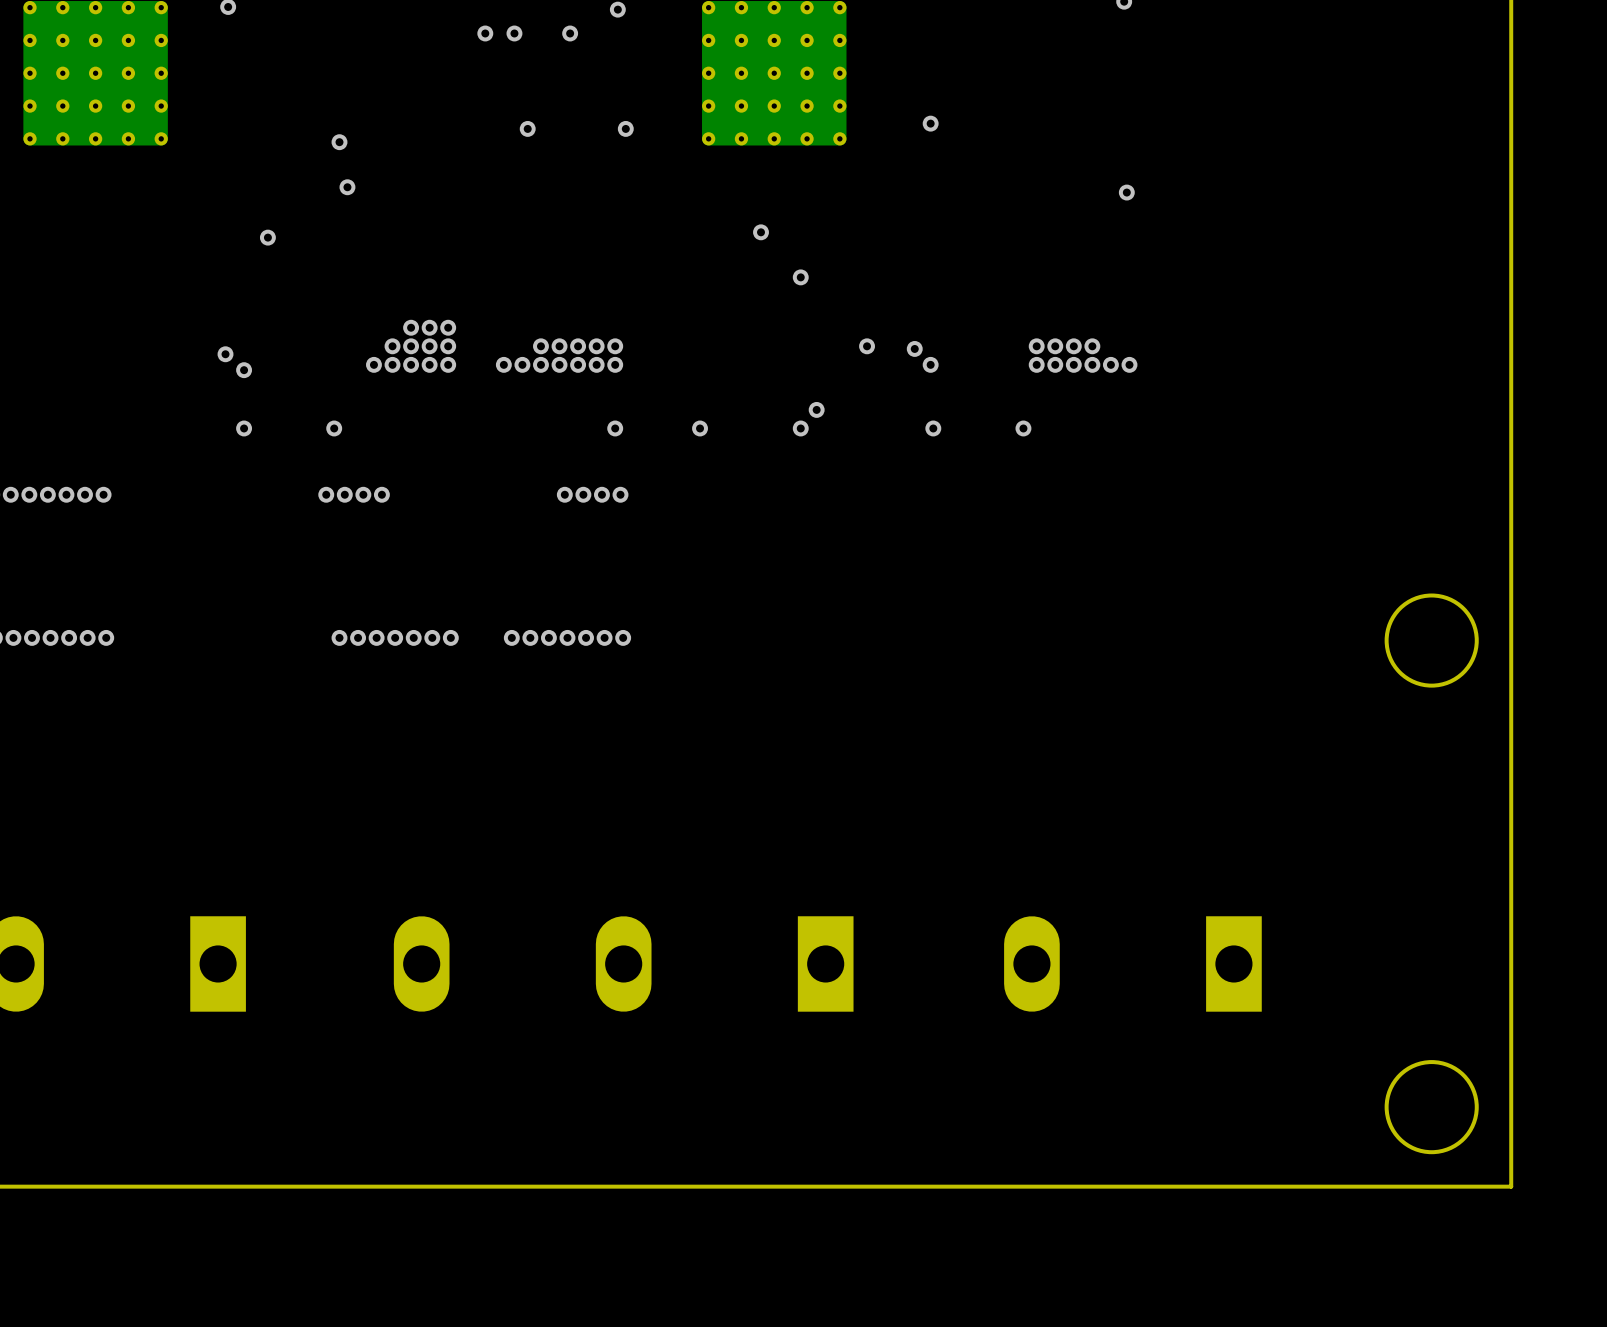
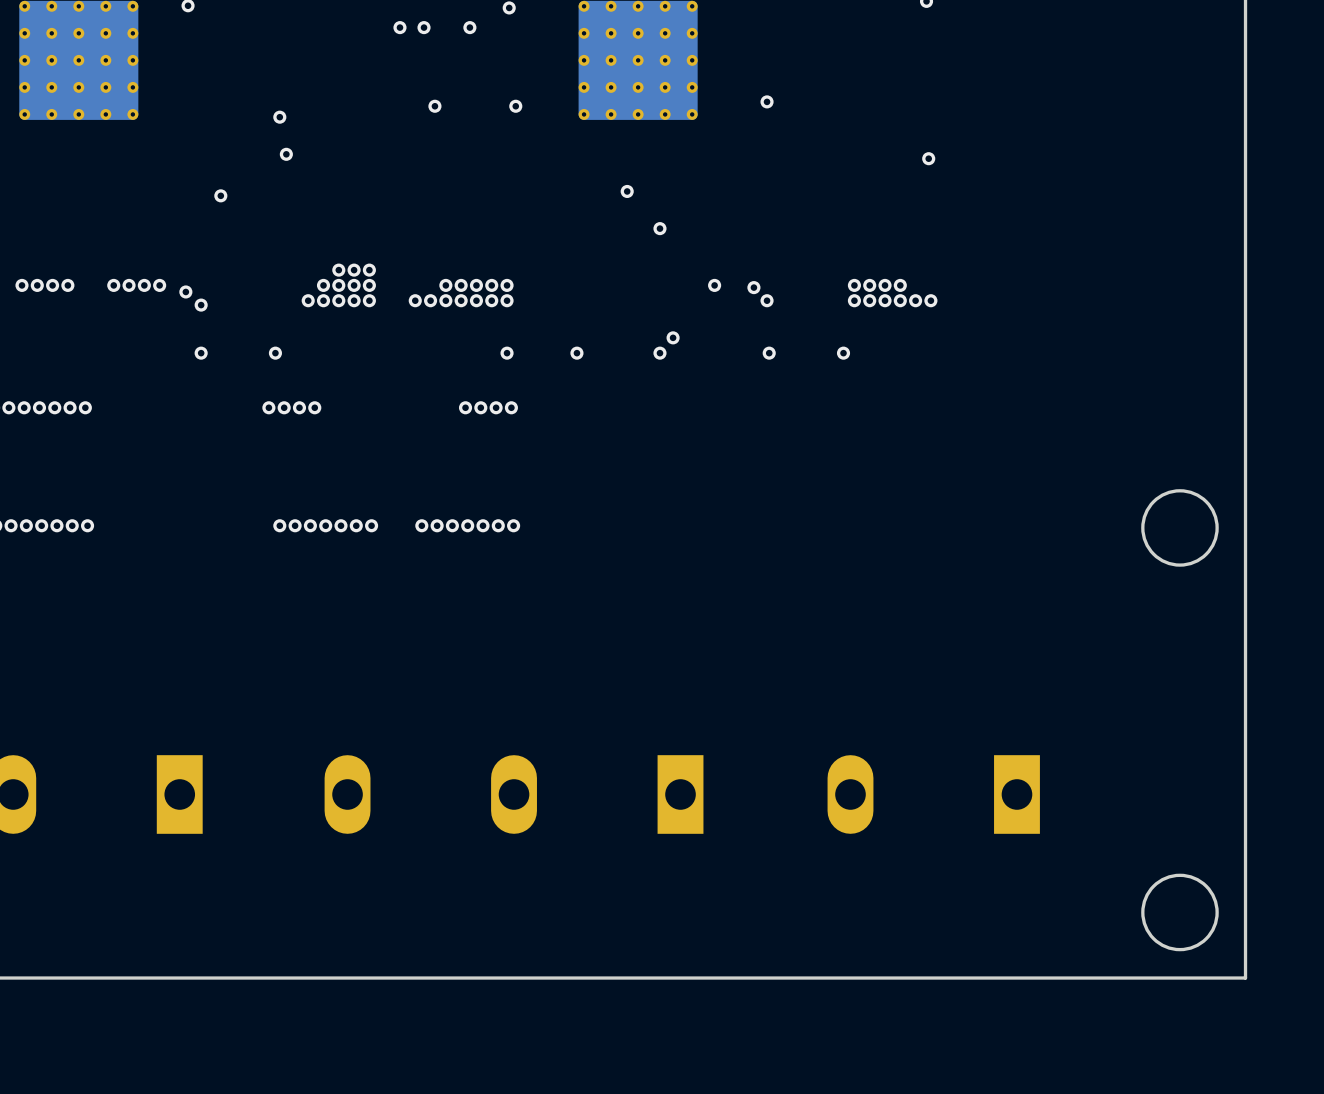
via: none -> (21, 285)
via: none -> (37, 285)
via: none -> (52, 285)
via: none -> (67, 285)
via: none -> (113, 285)
via: none -> (129, 285)
via: none -> (144, 285)
via: none -> (159, 285)

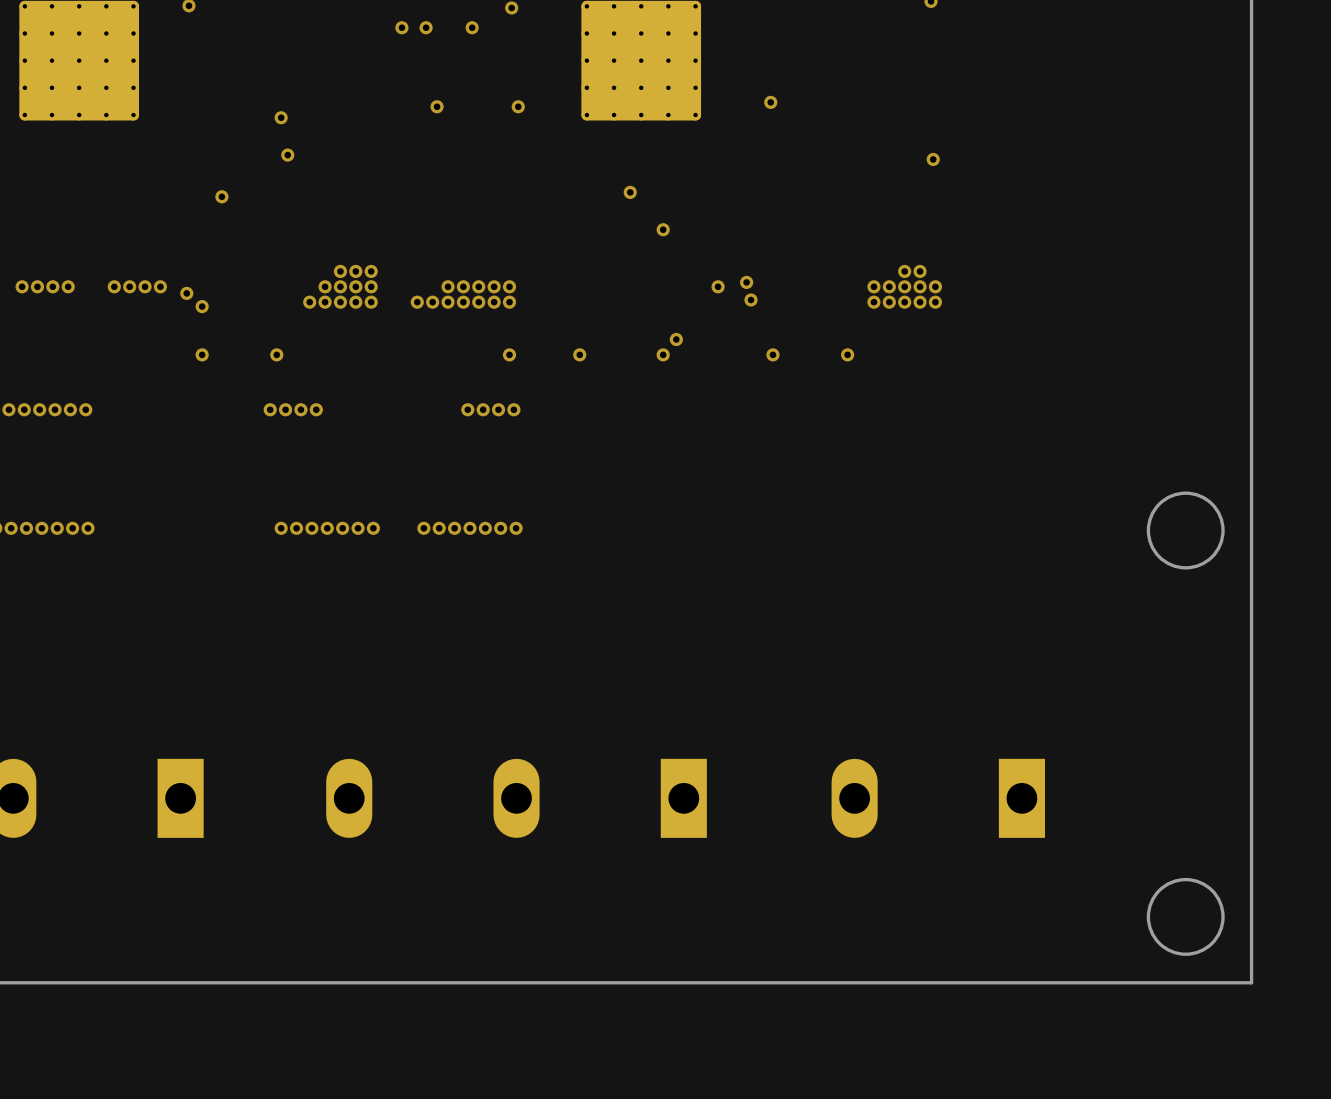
via: none -> (904, 271)
via: none -> (920, 271)
via: none -> (746, 282)
via: (854, 285) -> none
via: none -> (920, 286)
via: none -> (935, 286)
via: (753, 287) -> none
via: none -> (751, 299)
via: (767, 300) -> none
via: (854, 300) -> none

